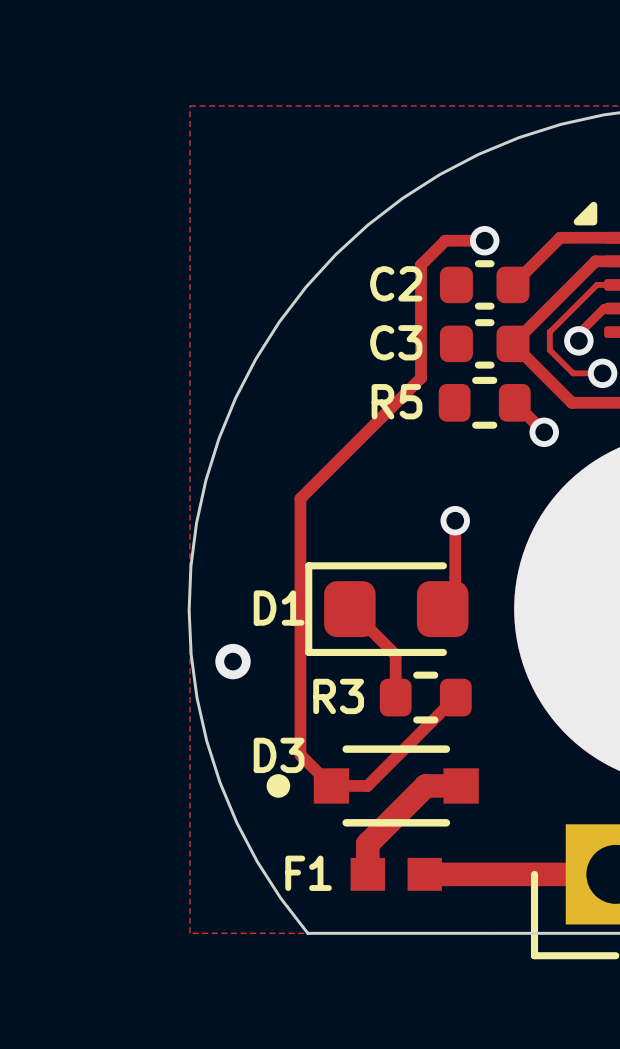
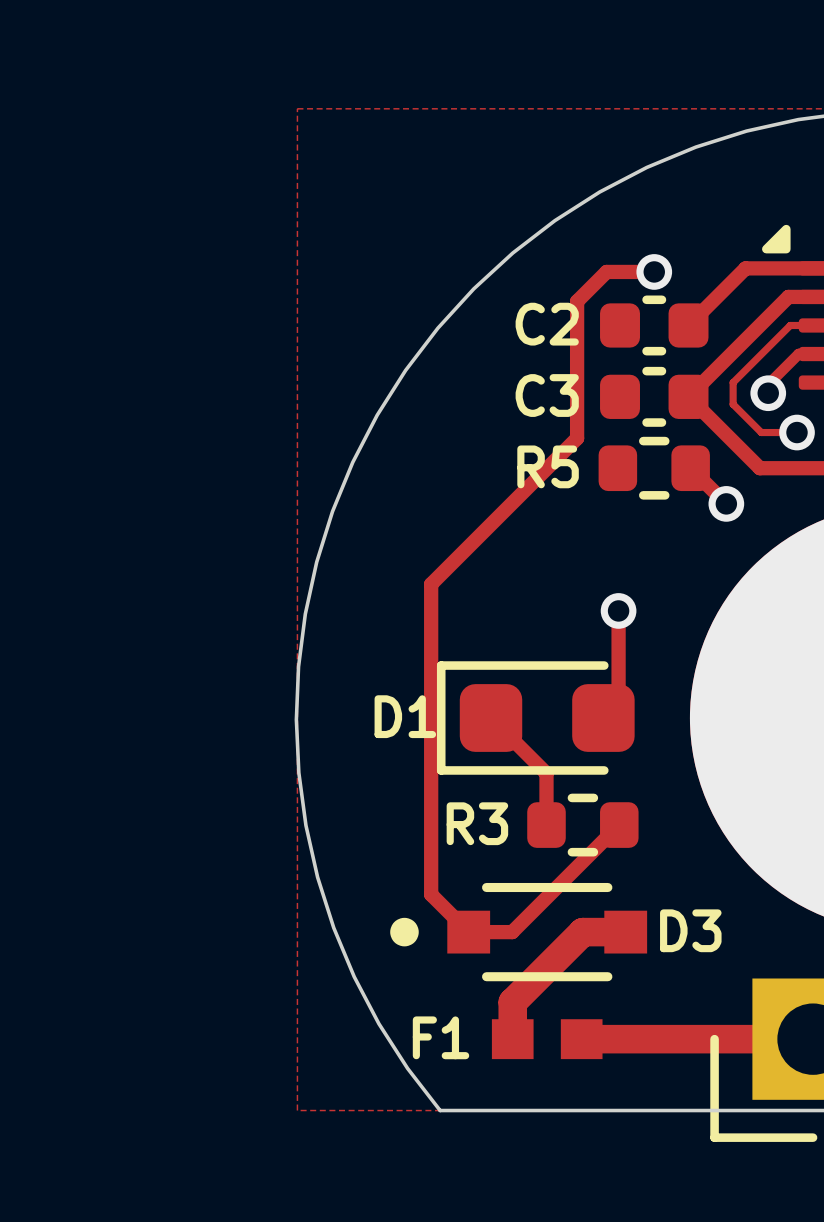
via: (233, 661) -> none
D3 name position: D3 (279, 755) -> D3 (690, 930)

